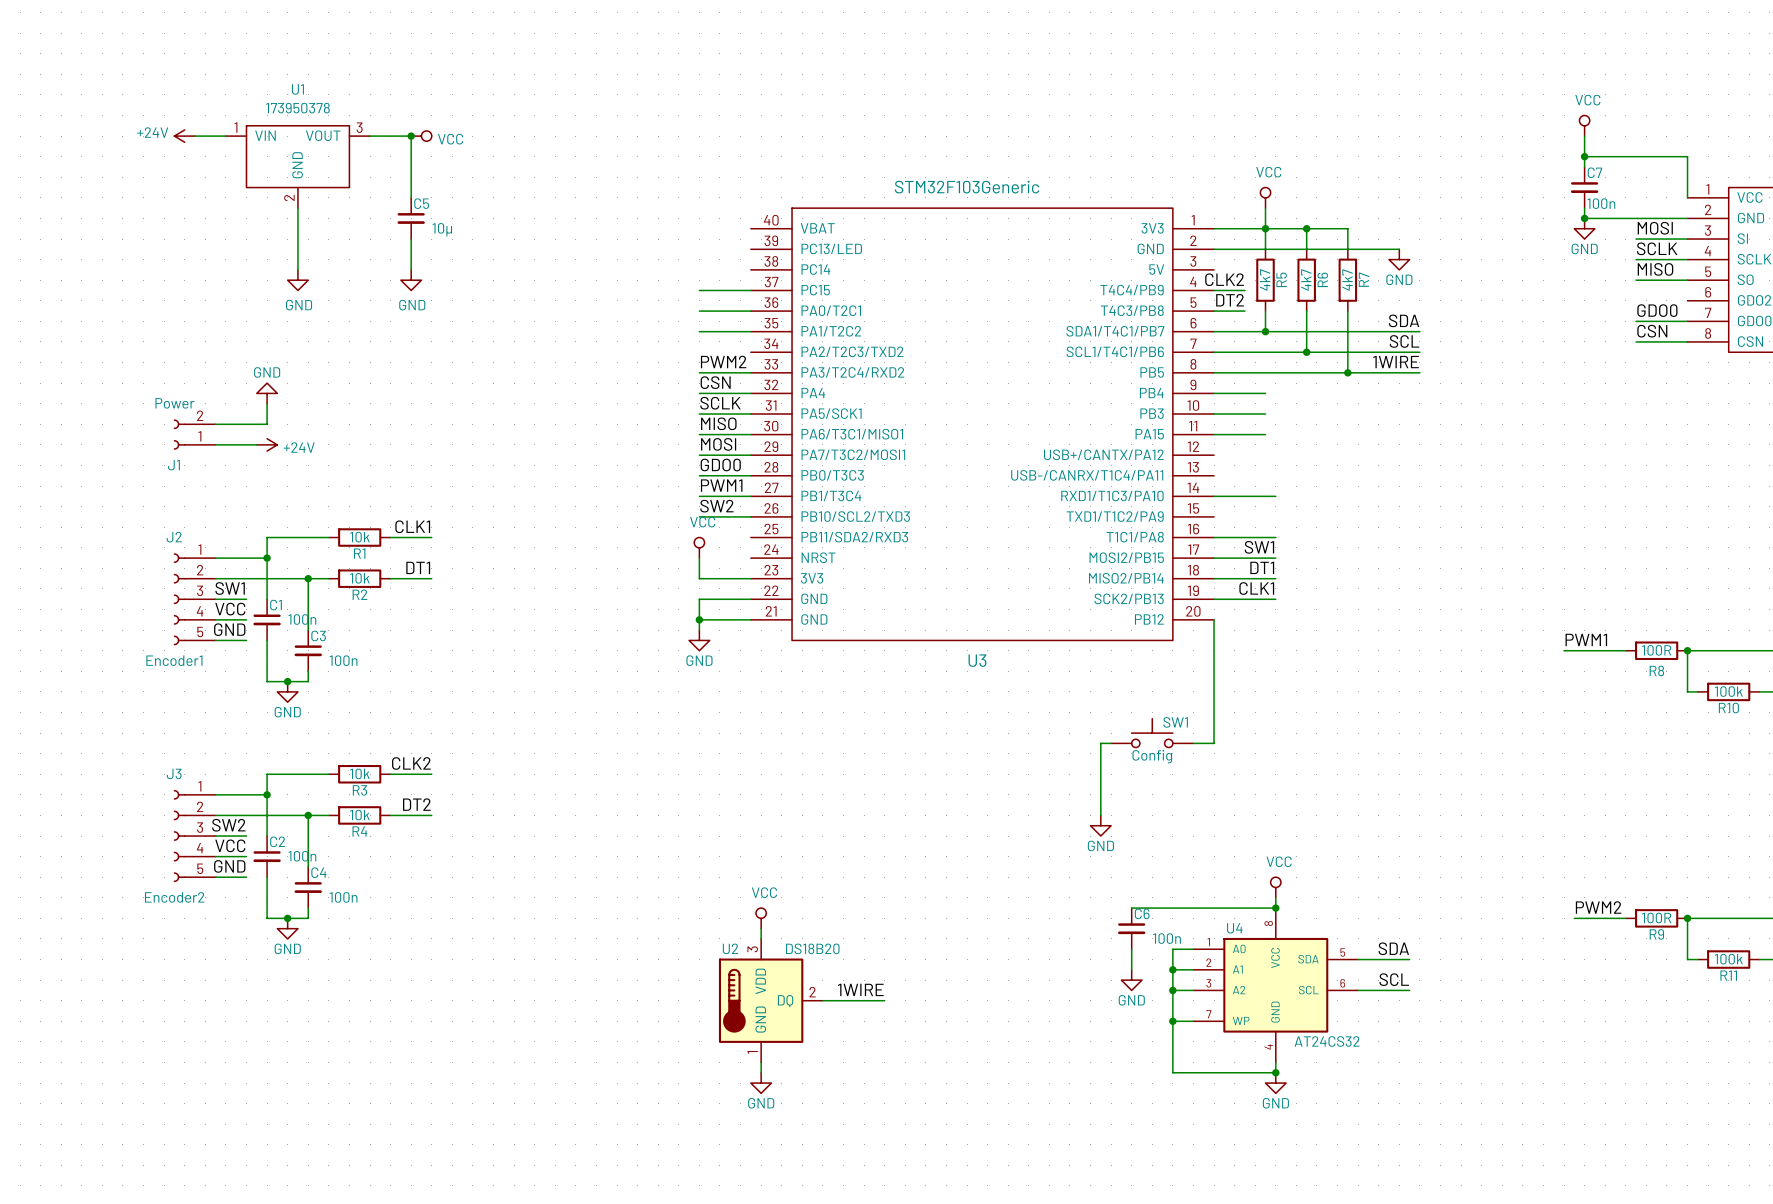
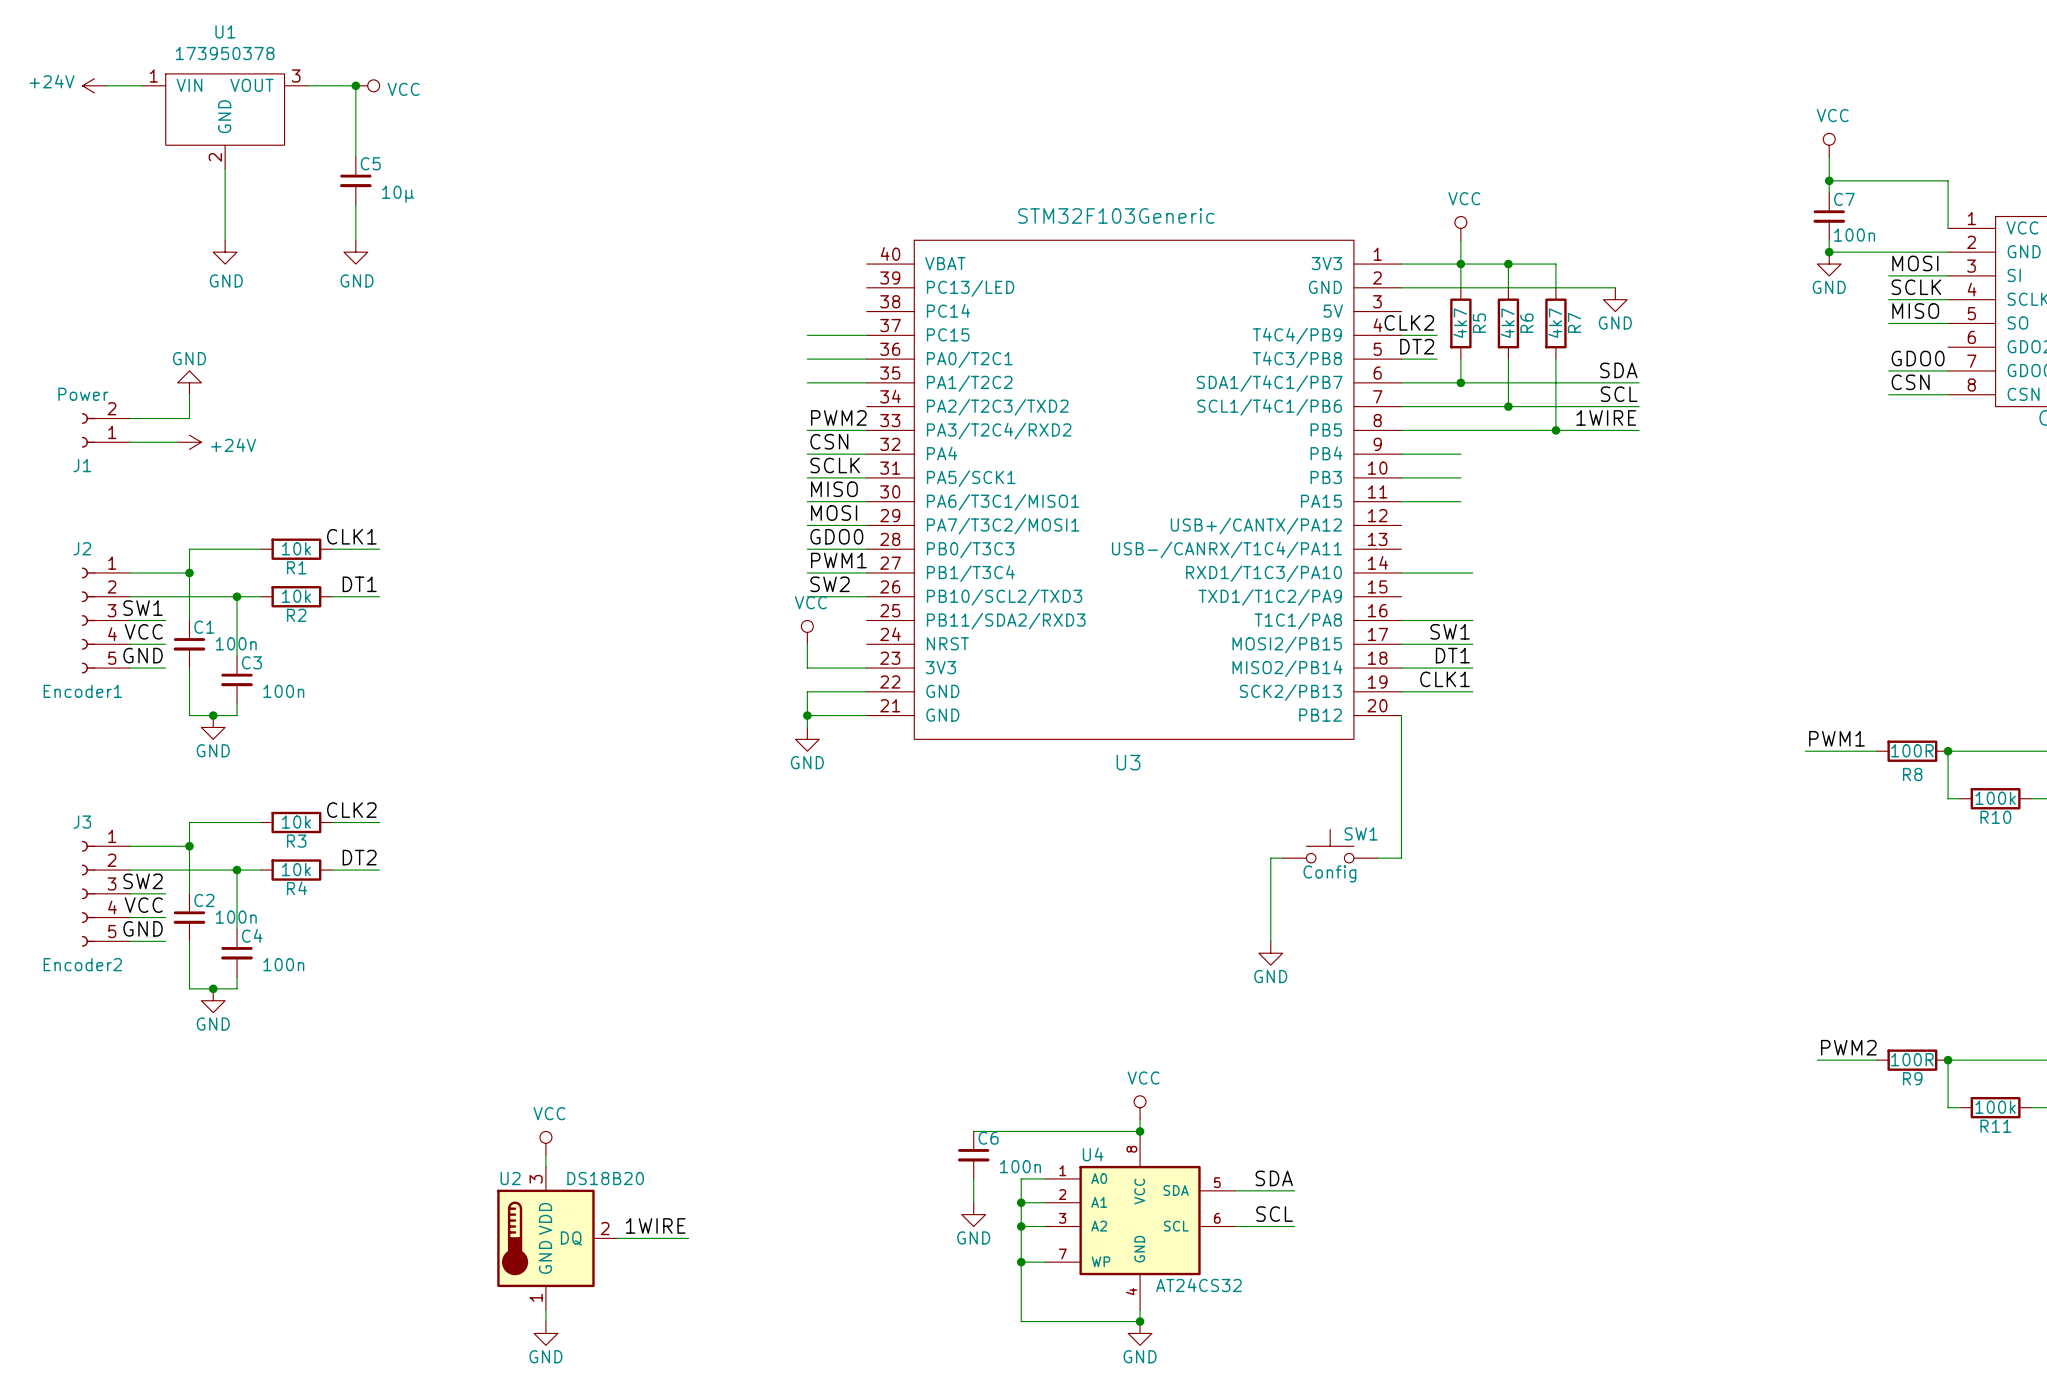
junction: none -> (355, 85)
power symbol position: +24V (184, 136) -> +24V (94, 85)
wire: (195, 136) (225, 136) -> (106, 85) (141, 85)
wire: (370, 136) (411, 136) (411, 197) -> (308, 85) (355, 85) (355, 157)
junction: (411, 136) -> none
power symbol position: VCC (421, 136) -> VCC (367, 85)
U1 position: (297, 166) -> (225, 121)
wire: (297, 208) (297, 269) -> (225, 168) (225, 240)
power symbol: none -> GND (225, 252)
power symbol: none -> GND (355, 252)
C5 position: (411, 218) -> (355, 180)
wire: (411, 239) (411, 269) -> (355, 204) (355, 240)
power symbol: GND (297, 280) -> none
power symbol: GND (411, 280) -> none
power symbol: none -> GND (189, 382)
power symbol: GND (267, 393) -> none
wire: (267, 403) (267, 424) (215, 424) -> (189, 394) (189, 418) (130, 418)
J1 position: (194, 434) -> (105, 430)
wire: (215, 444) (256, 444) -> (130, 442) (177, 442)
power symbol position: +24V (267, 444) -> +24V (189, 442)
junction: none -> (189, 572)
junction: none -> (237, 596)
label position: CLK1 (412, 526) -> CLK1 (351, 536)
wire: (328, 537) (267, 537) (267, 599) -> (260, 549) (189, 549) (189, 620)
R1 position: (359, 537) -> (296, 549)
wire: (390, 537) (431, 537) -> (332, 549) (379, 549)
label: none -> VCC (143, 631)
wire: (215, 558) (267, 558) -> (130, 572) (189, 572)
junction: (267, 558) -> none
label: none -> GND (143, 655)
label position: DT1 (418, 567) -> DT1 (359, 584)
wire: (215, 578) (328, 578) -> (130, 596) (260, 596)
wire: (308, 578) (308, 630) -> (237, 596) (237, 656)
junction: (308, 578) -> none
R2 position: (359, 578) -> (296, 596)
wire: (390, 578) (431, 578) -> (332, 596) (379, 596)
label position: SW1 (230, 588) -> SW1 (143, 608)
J2 position: (194, 599) -> (105, 620)
wire: (215, 599) (246, 599) -> (130, 620) (165, 620)
label: VCC (230, 609) -> none
junction: none -> (213, 715)
wire: (215, 619) (246, 619) -> (130, 644) (165, 644)
C1 position: (267, 619) -> (189, 644)
label: GND (229, 629) -> none
power symbol: none -> GND (213, 727)
wire: (215, 640) (246, 640) -> (130, 668) (165, 668)
wire: (267, 640) (267, 681) (308, 681) (308, 671) -> (189, 668) (189, 715) (237, 715) (237, 703)
C3 position: (308, 650) -> (237, 679)
junction: (287, 681) -> none
power symbol: GND (287, 691) -> none
junction: none -> (189, 846)
junction: none -> (237, 870)
label position: CLK2 (411, 763) -> CLK2 (351, 810)
wire: (328, 774) (267, 774) (267, 836) -> (260, 822) (189, 822) (189, 893)
R3 position: (359, 774) -> (296, 822)
wire: (390, 774) (431, 774) -> (332, 822) (379, 822)
label: none -> VCC (143, 905)
wire: (215, 794) (267, 794) -> (130, 846) (189, 846)
junction: (267, 794) -> none
label: none -> GND (143, 928)
label position: DT2 (416, 804) -> DT2 (359, 857)
wire: (215, 815) (328, 815) -> (130, 870) (260, 870)
wire: (308, 815) (308, 866) -> (237, 870) (237, 929)
junction: (308, 815) -> none
R4 position: (359, 815) -> (296, 870)
wire: (390, 815) (431, 815) -> (332, 870) (379, 870)
label position: SW2 (228, 825) -> SW2 (143, 881)
J3 position: (194, 836) -> (105, 893)
wire: (215, 836) (246, 836) -> (130, 893) (165, 893)
label: VCC (230, 845) -> none
junction: none -> (213, 988)
wire: (215, 856) (246, 856) -> (130, 917) (165, 917)
C2 position: (267, 856) -> (189, 917)
power symbol: none -> GND (213, 1000)
label: GND (229, 866) -> none
wire: (215, 877) (246, 877) -> (130, 941) (165, 941)
wire: (267, 877) (267, 918) (308, 918) (308, 908) -> (189, 941) (189, 988) (237, 988) (237, 976)
C4 position: (308, 887) -> (237, 953)
power symbol: VCC (1275, 887) -> none
wire: (1275, 897) (1275, 908) (1131, 908) -> none
junction: (1275, 908) -> none
junction: (287, 918) -> none
power symbol: VCC (761, 918) -> none
power symbol: GND (287, 928) -> none
wire: (761, 928) (761, 938) -> none
C6 position: (1131, 928) -> (973, 1155)
label: SDA (1393, 948) -> none
wire: (1131, 949) (1131, 969) -> none
wire: (1193, 949) (1172, 949) (1172, 1072) (1275, 1072) (1275, 1062) -> none
power symbol: none -> VCC (1140, 1107)
wire: (1358, 959) (1409, 959) -> none
wire: none -> (1140, 1119) (1140, 1131) (973, 1131)
wire: (1172, 969) (1193, 969) -> none
junction: (1172, 969) -> none
label: SCL (1394, 979) -> none
junction: none -> (1140, 1131)
power symbol: GND (1131, 980) -> none
U4 position: (1275, 985) -> (1140, 1220)
label: 1WIRE (860, 989) -> none
power symbol: none -> VCC (545, 1143)
wire: (1172, 990) (1193, 990) -> none
junction: (1172, 990) -> none
wire: (1358, 990) (1409, 990) -> none
wire: none -> (545, 1155) (545, 1167)
U2 position: (770, 1000) -> (557, 1238)
wire: (822, 1000) (884, 1000) -> none
label: none -> SDA (1274, 1178)
wire: none -> (973, 1178) (973, 1202)
wire: none -> (1045, 1178) (1021, 1178) (1021, 1321) (1140, 1321) (1140, 1309)
wire: (1172, 1021) (1193, 1021) -> none
junction: (1172, 1021) -> none
wire: none -> (1235, 1190) (1294, 1190)
wire: none -> (1021, 1202) (1045, 1202)
junction: none -> (1021, 1202)
label: none -> SCL (1274, 1214)
label: none -> 1WIRE (655, 1225)
wire: (761, 1062) (761, 1072) -> none
wire: none -> (1021, 1226) (1045, 1226)
junction: none -> (1021, 1226)
wire: none -> (1235, 1226) (1294, 1226)
wire: none -> (617, 1238) (688, 1238)
junction: (1275, 1072) -> none
power symbol position: GND (761, 1083) -> GND (973, 1214)
power symbol: GND (1275, 1083) -> none
wire: none -> (1021, 1262) (1045, 1262)
junction: none -> (1021, 1262)
wire: none -> (545, 1309) (545, 1321)
junction: none -> (1140, 1321)
power symbol: none -> GND (545, 1333)
power symbol: none -> GND (1140, 1333)

